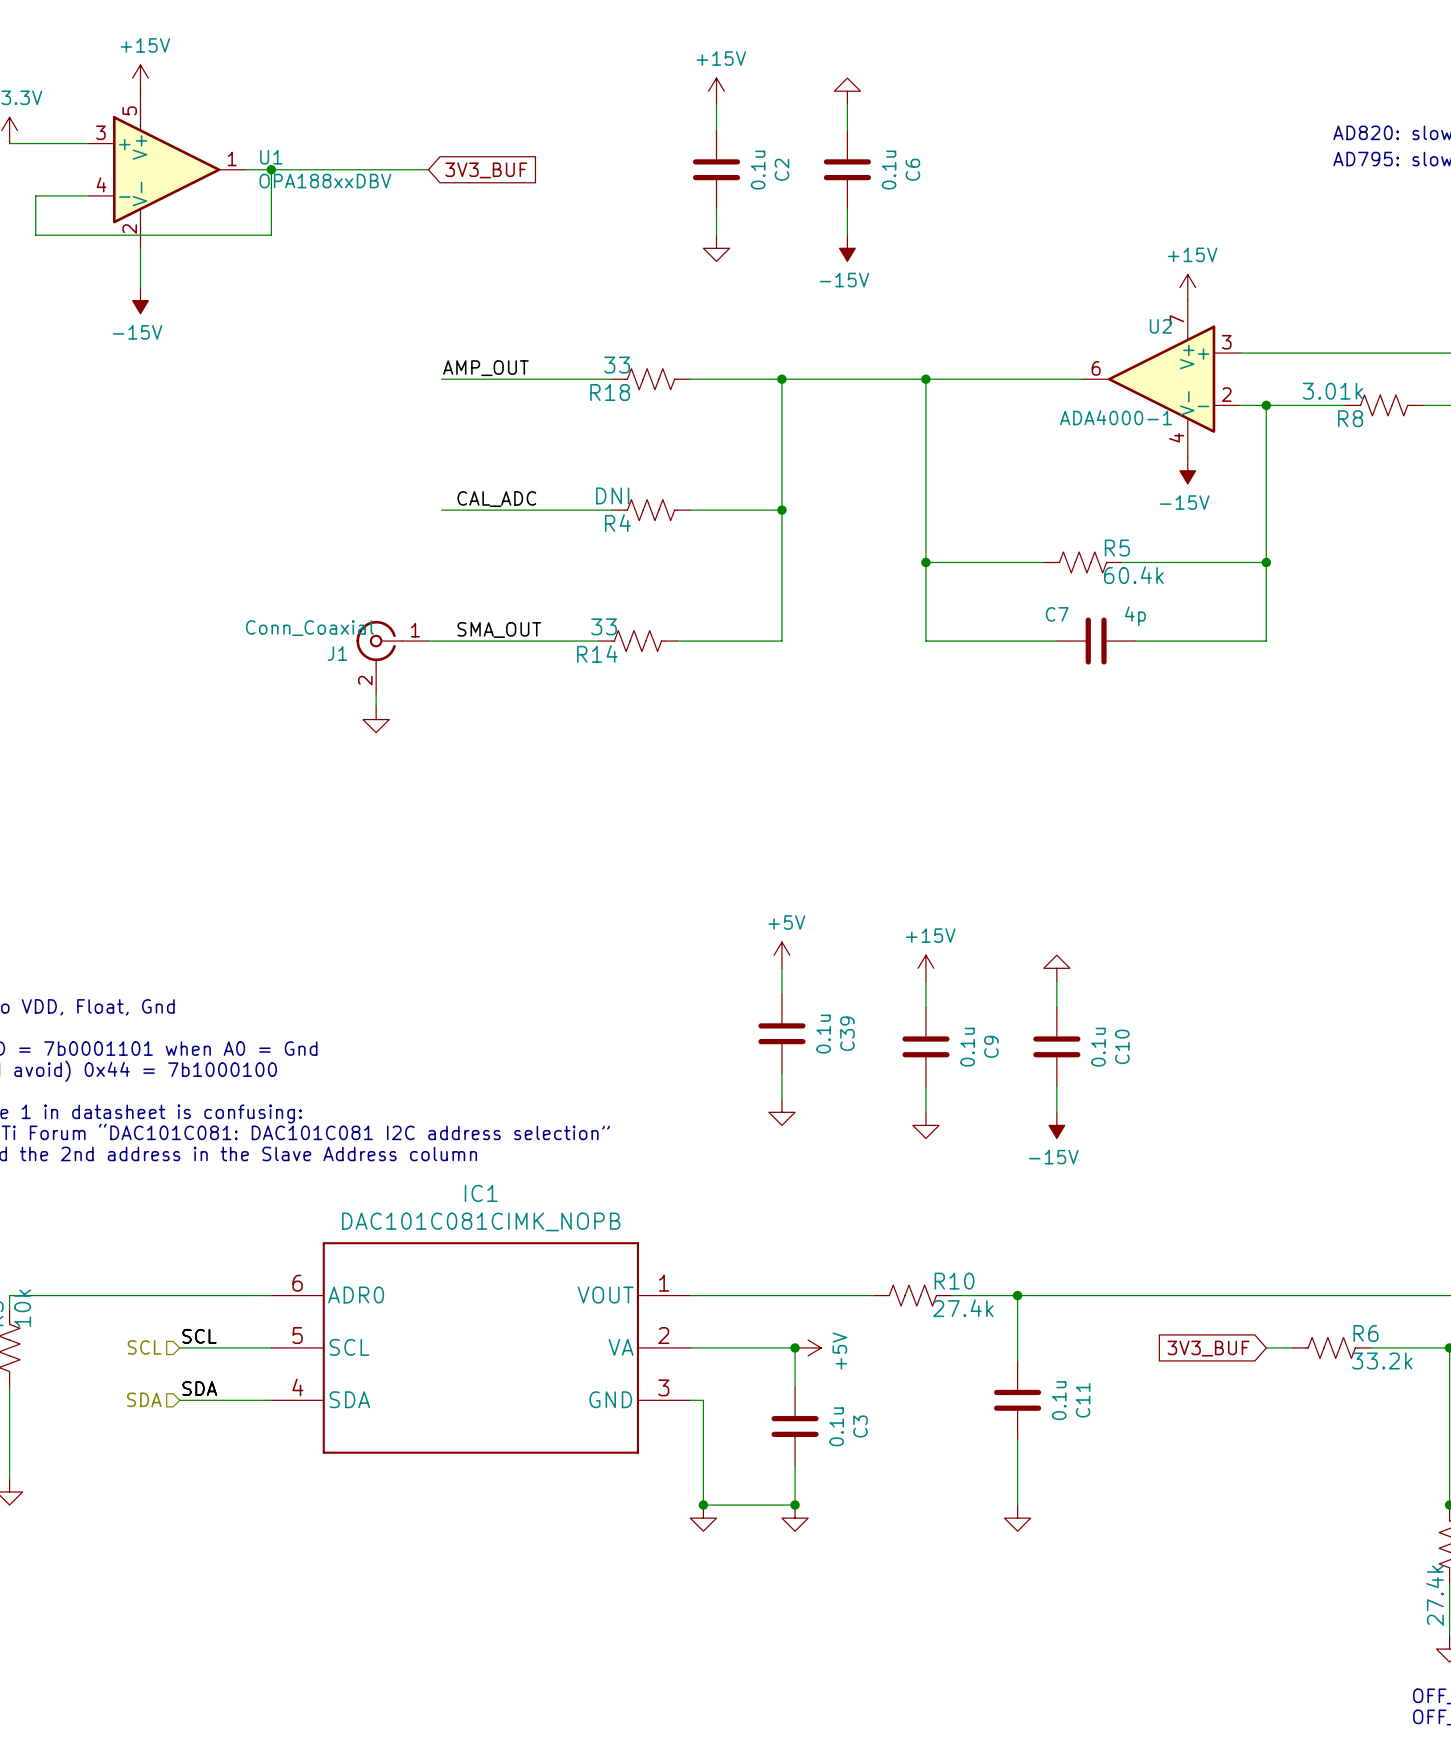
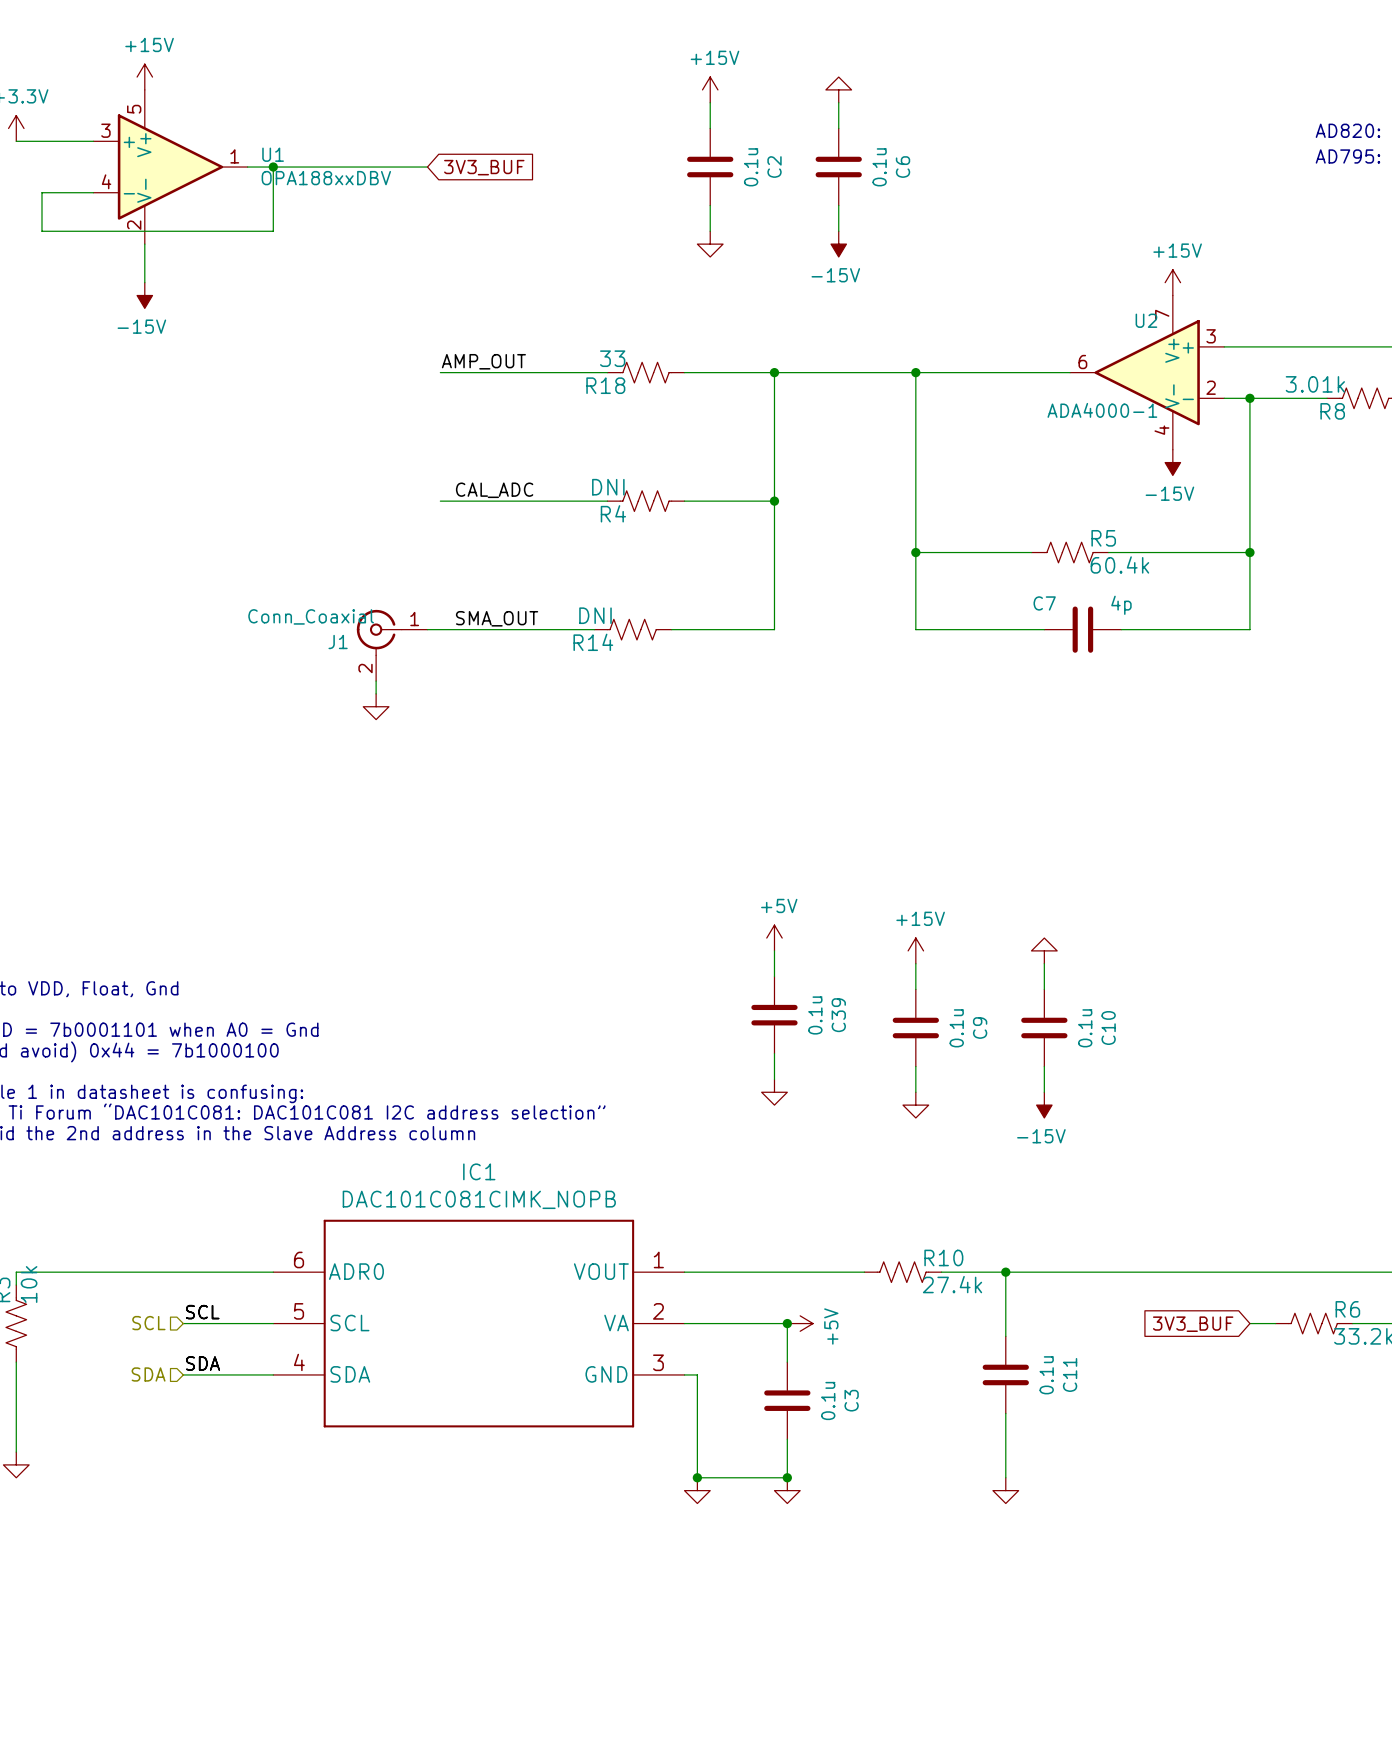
R14 value: 33 (604, 626) -> DNI (595, 615)

